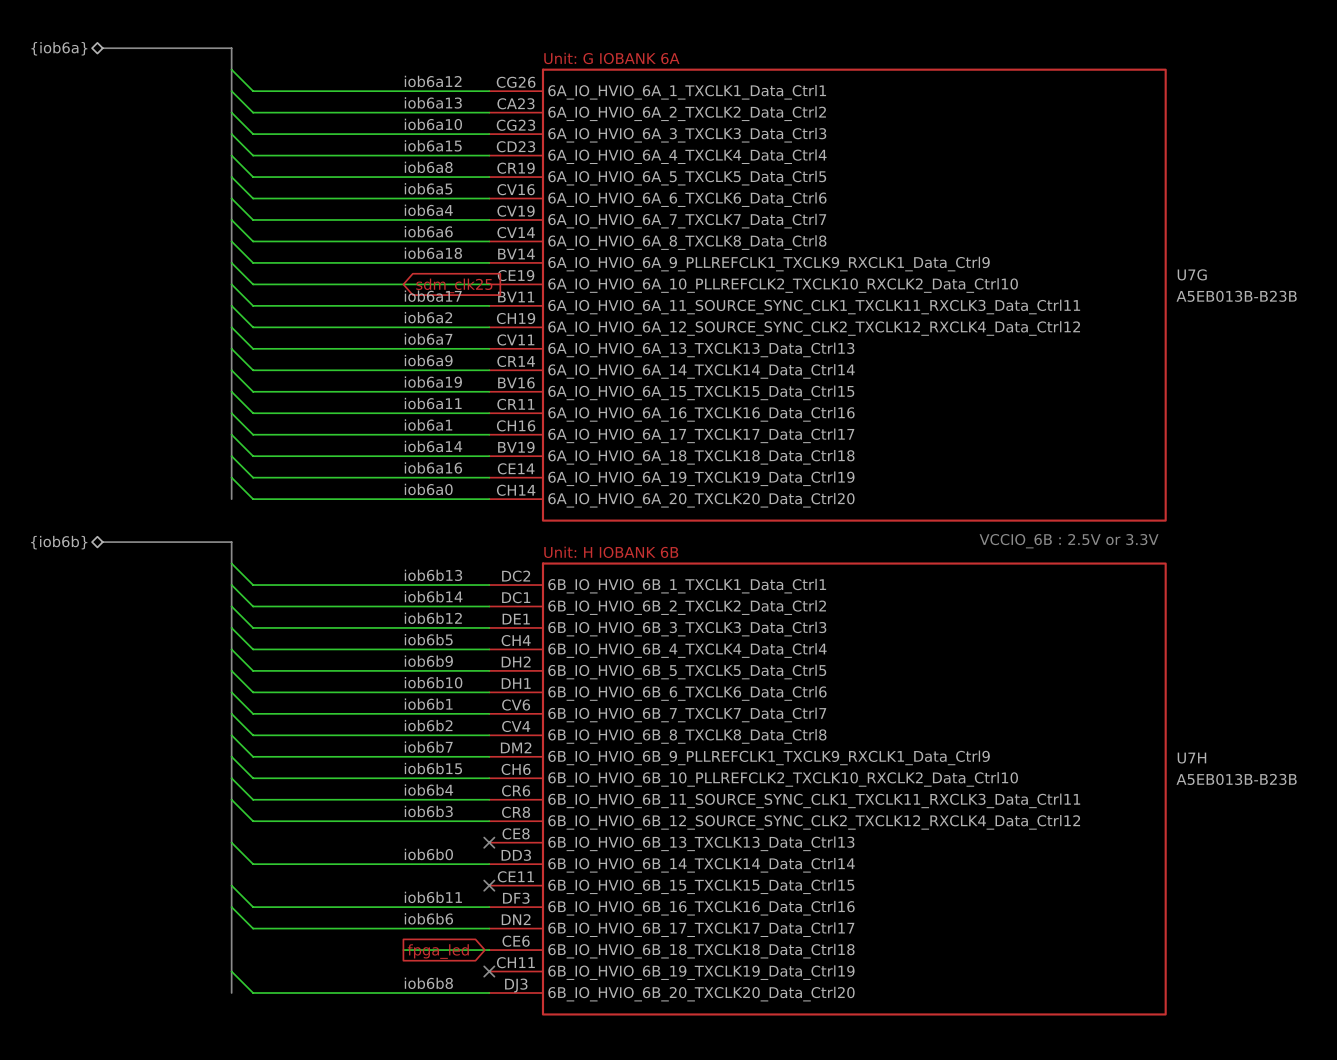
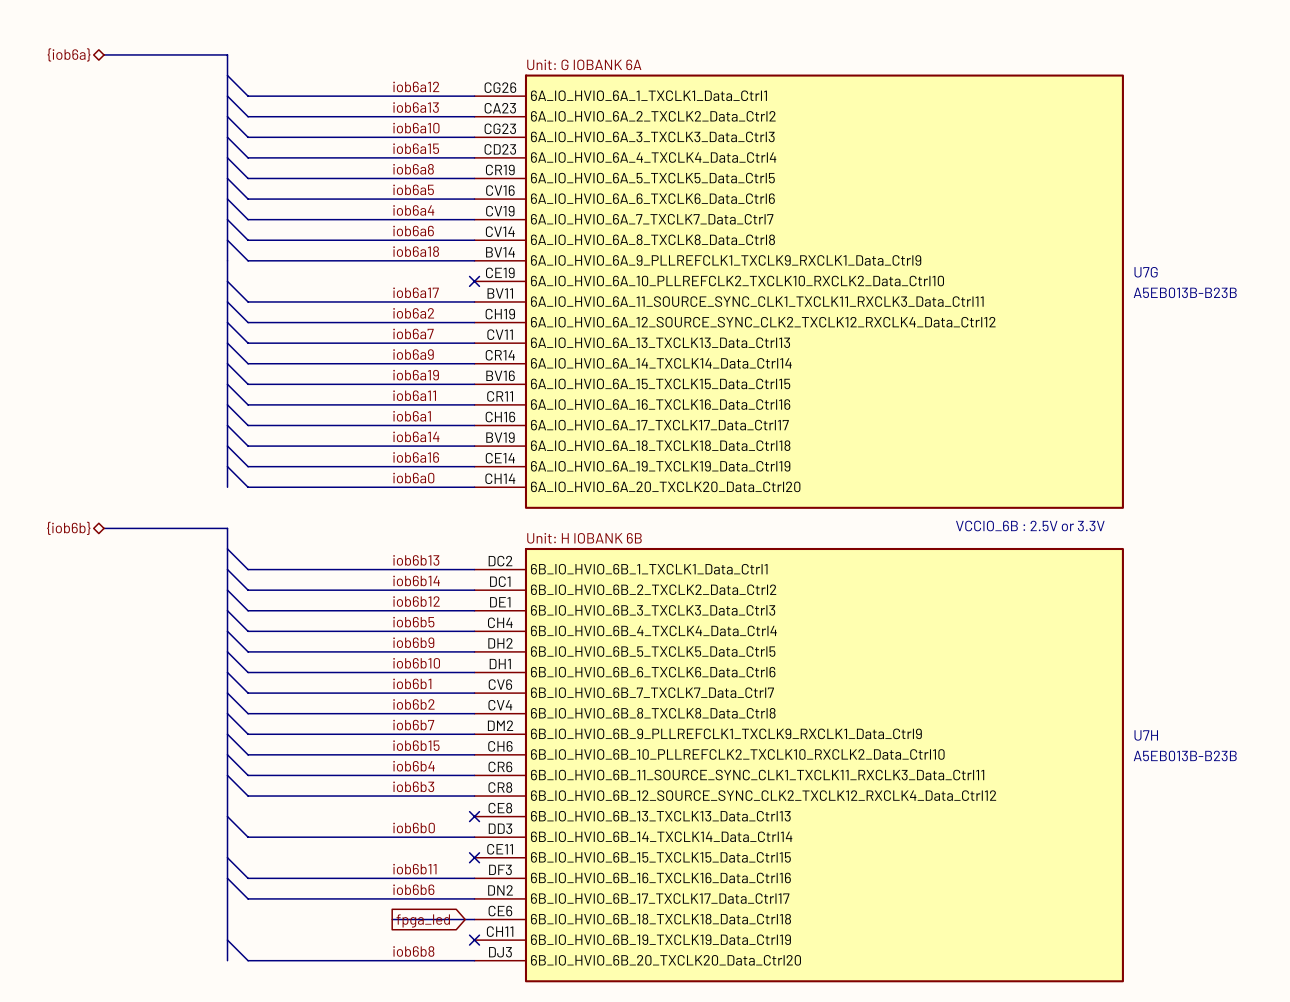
wire: (231, 262) (253, 284) (489, 284) -> none
no-connect mark: none -> (474, 281)
global label: sdm_clk25 (454, 285) -> none

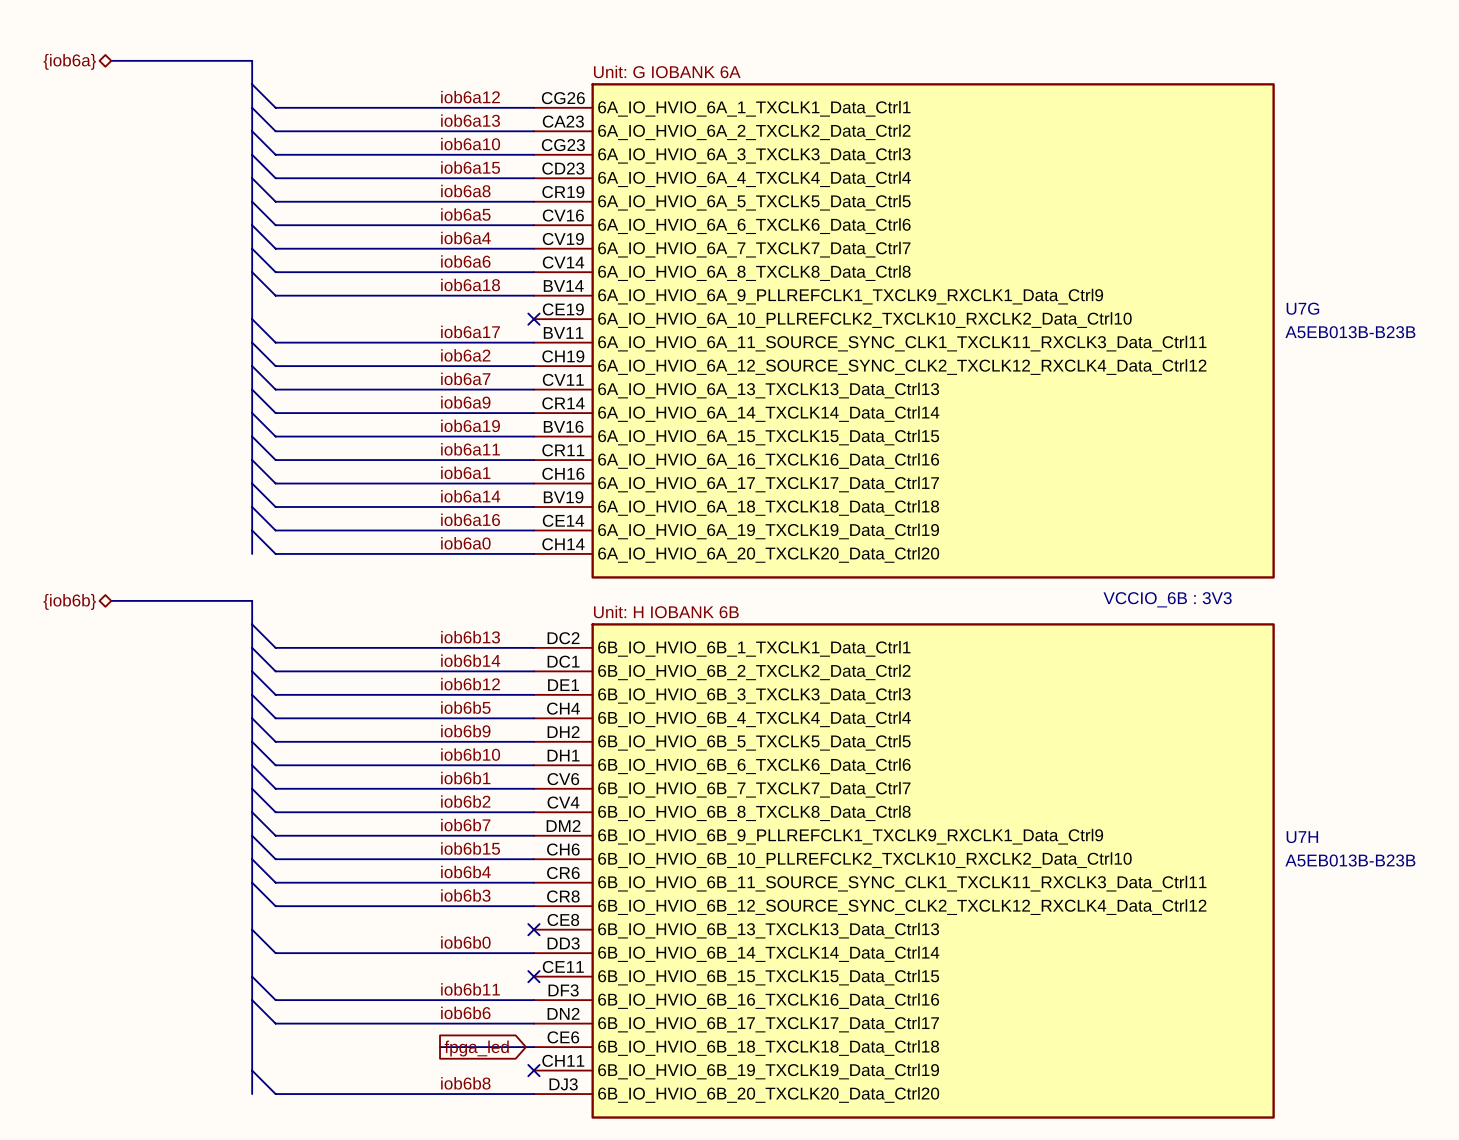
text: VCCIO_6B : 2.5V or 3.3V (1030, 526) -> VCCIO_6B : 3V3 (1167, 599)

